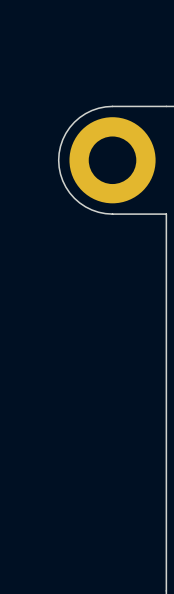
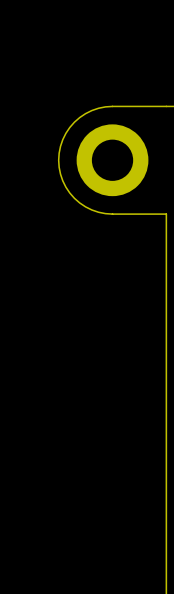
part footprint: [69, 117, 156, 204] -> [76, 124, 149, 197]

